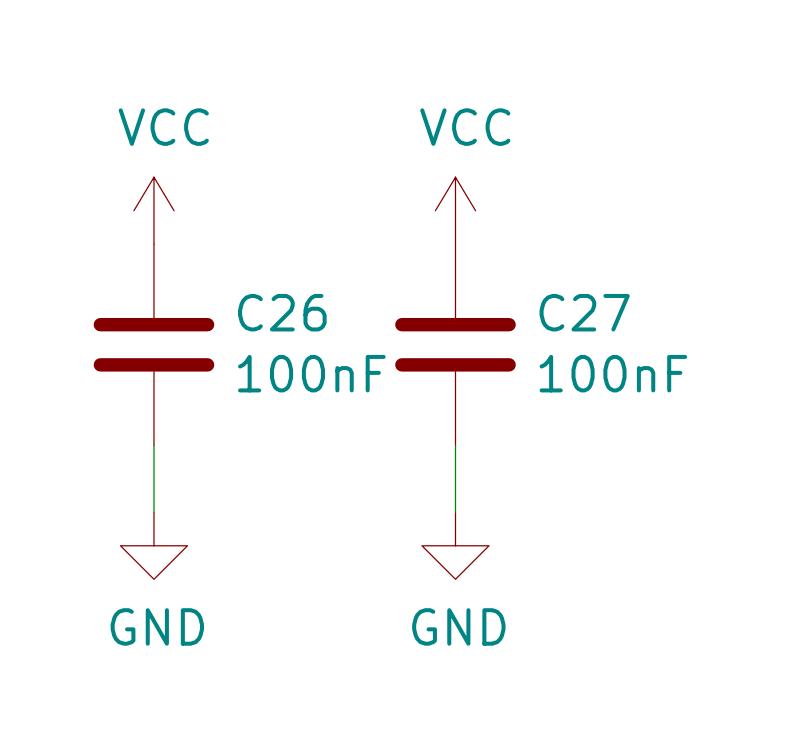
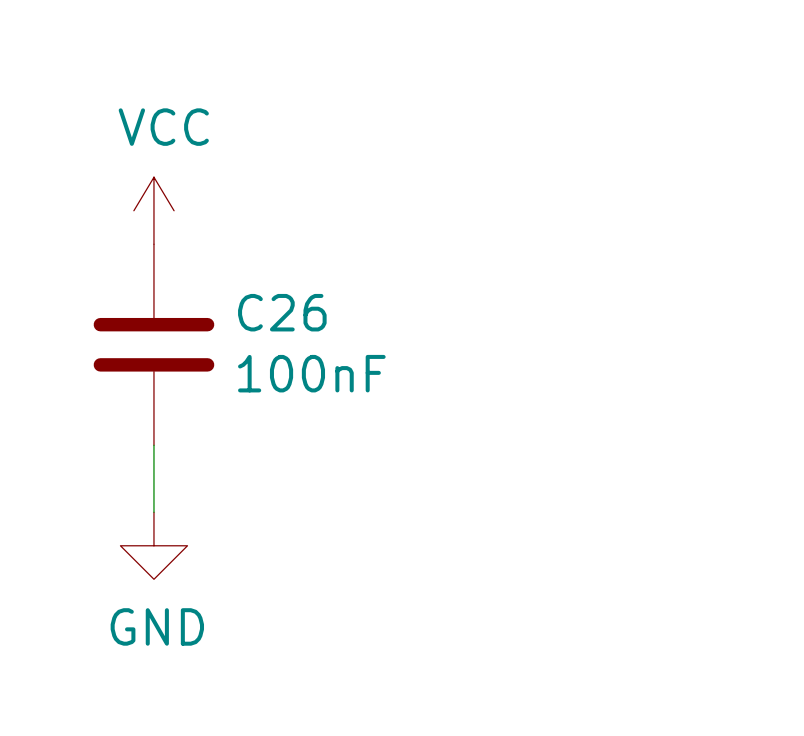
power symbol: VCC (455, 210) -> none
C27: 100nF (455, 344) -> none
wire: (455, 445) (455, 512) -> none
power symbol: GND (455, 545) -> none

